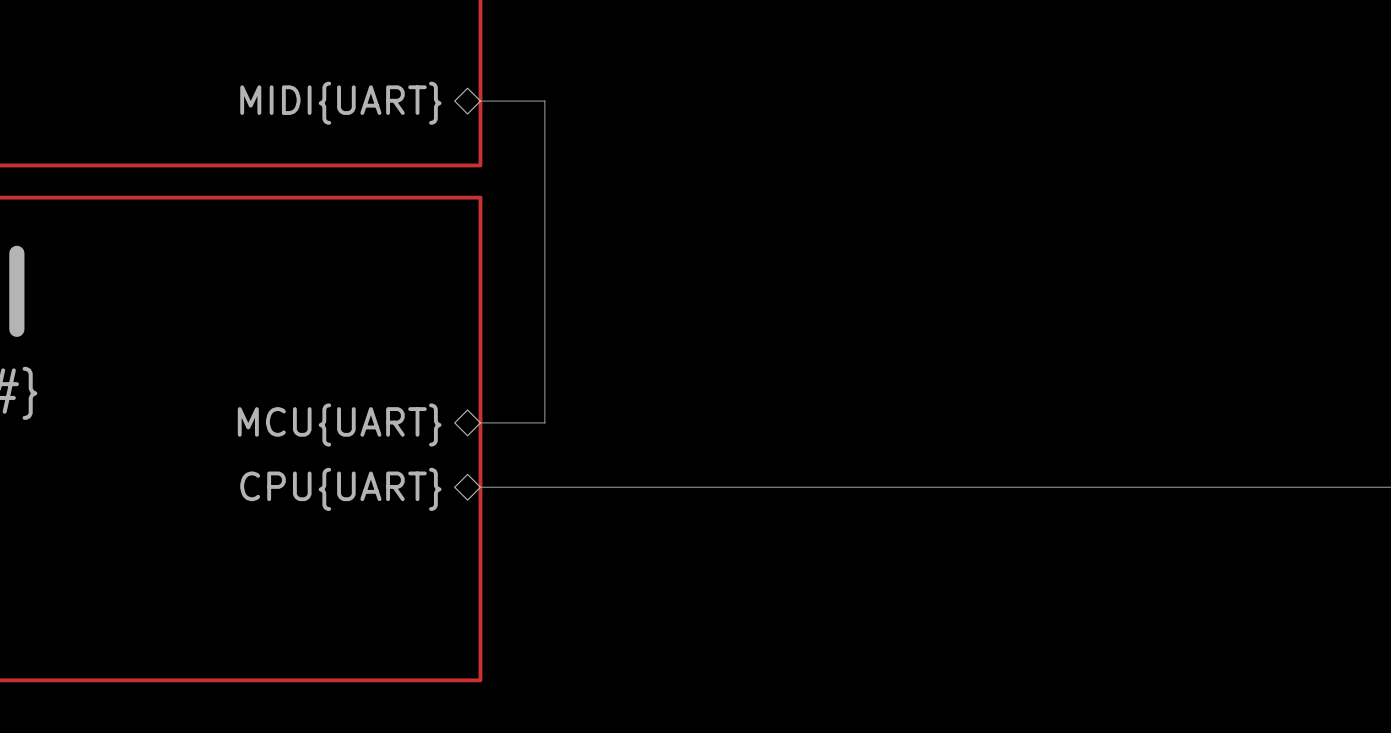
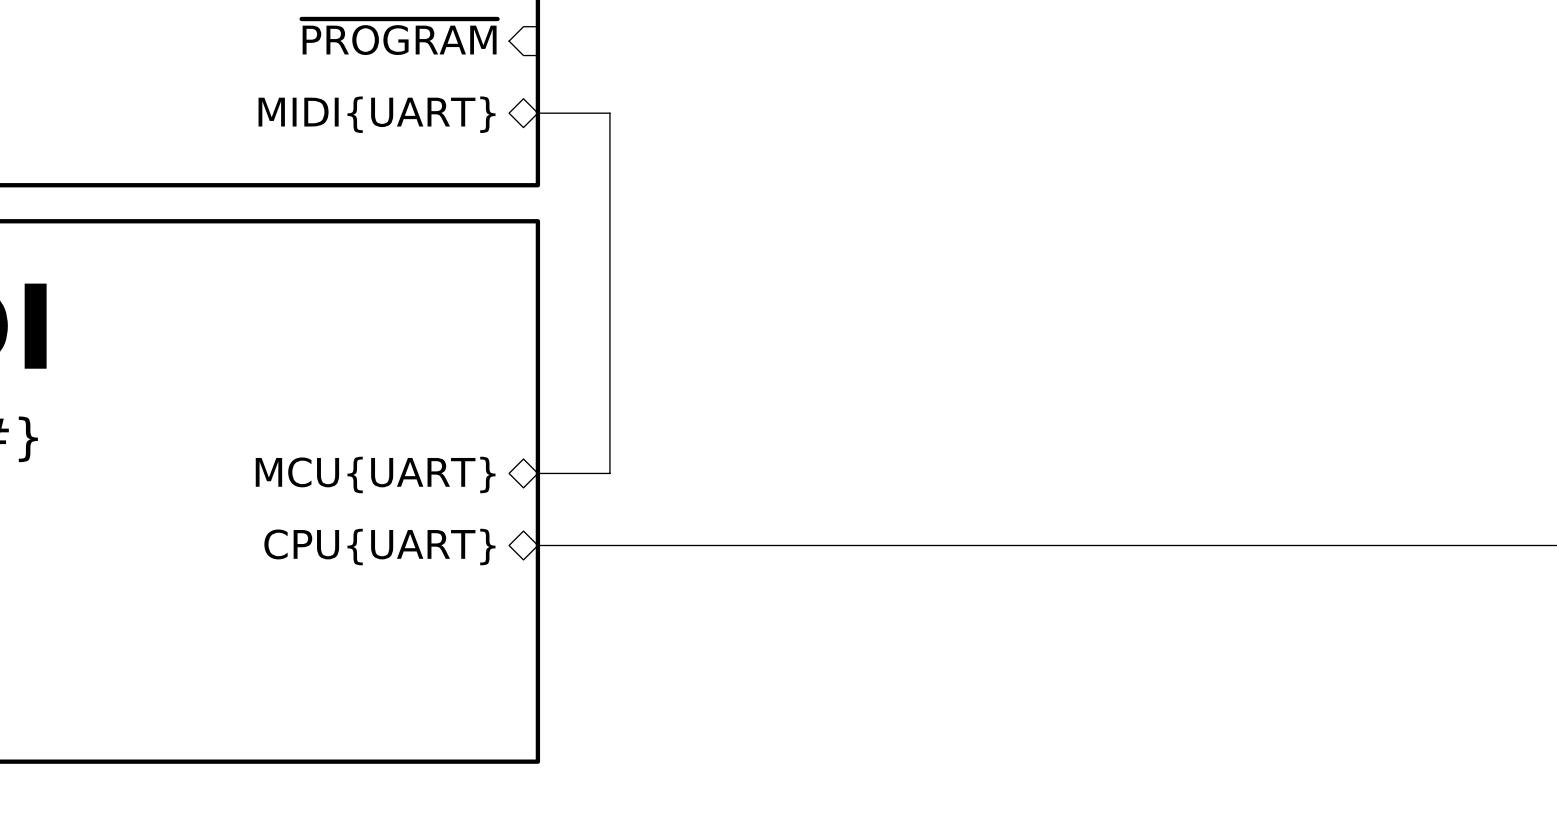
sheet pin: none -> ~{PROGRAM} (399, 37)

